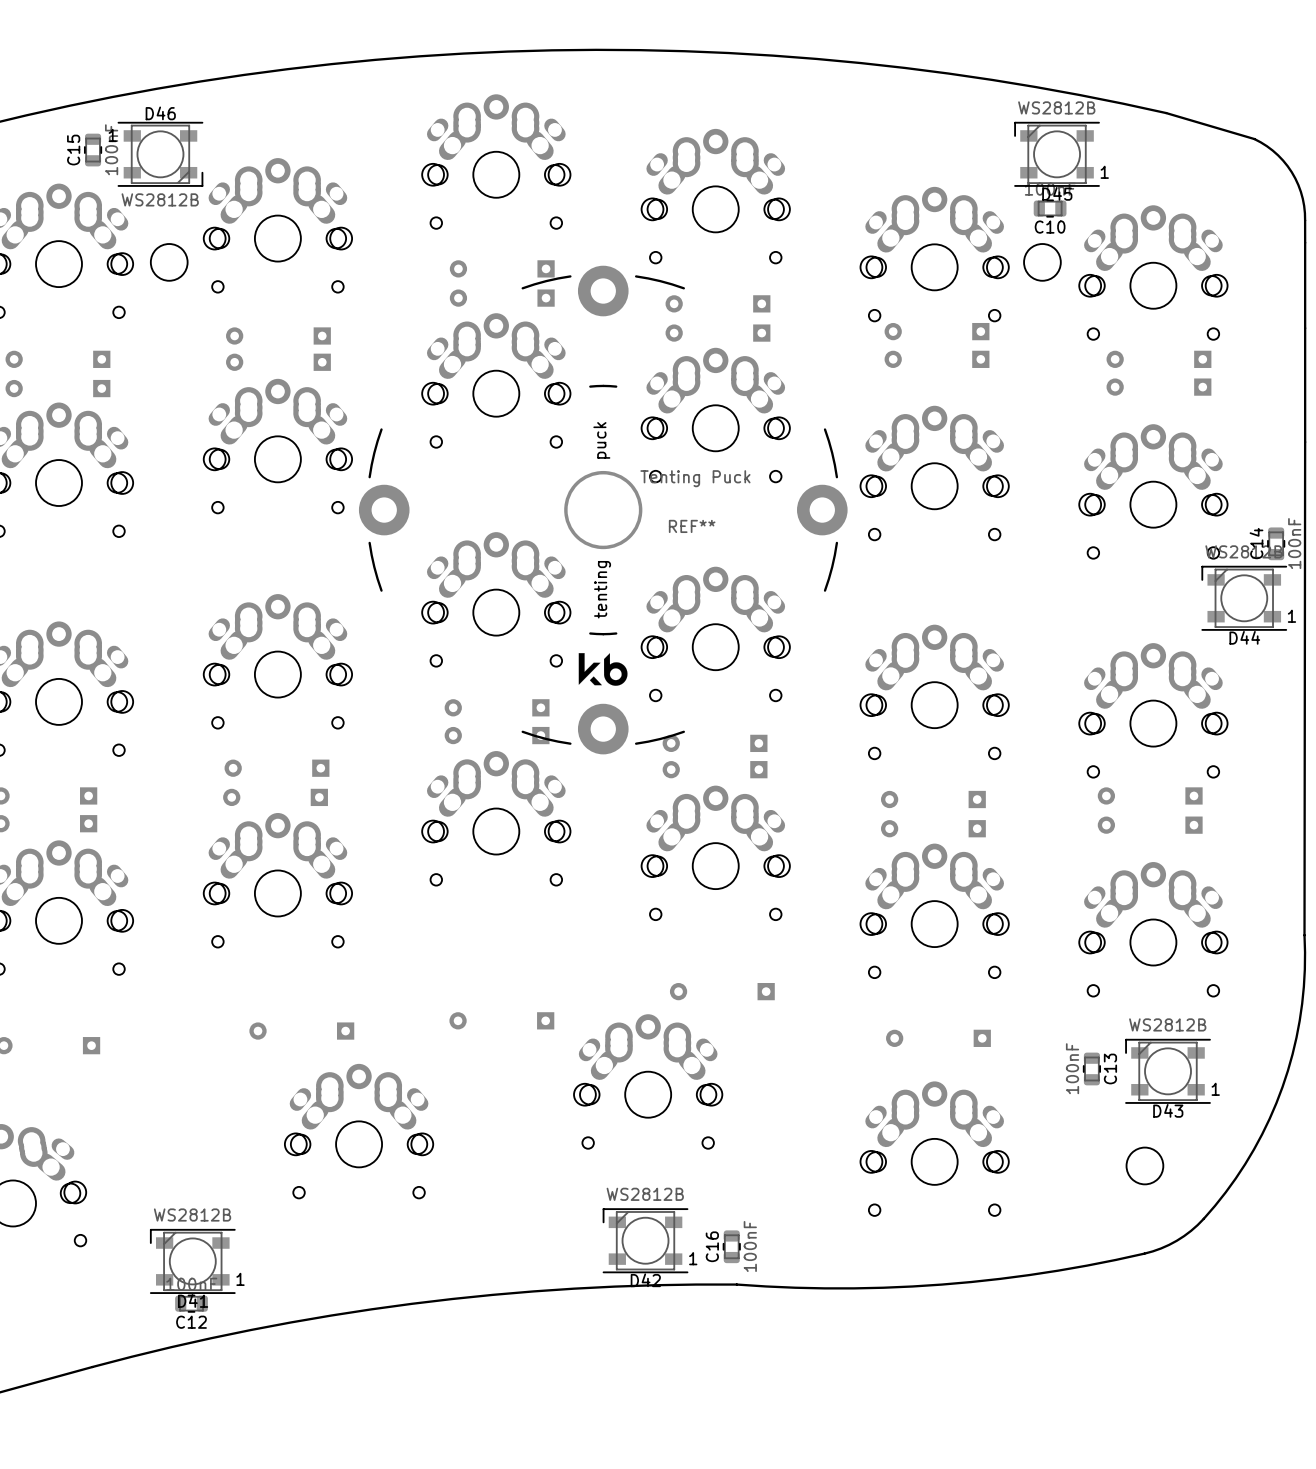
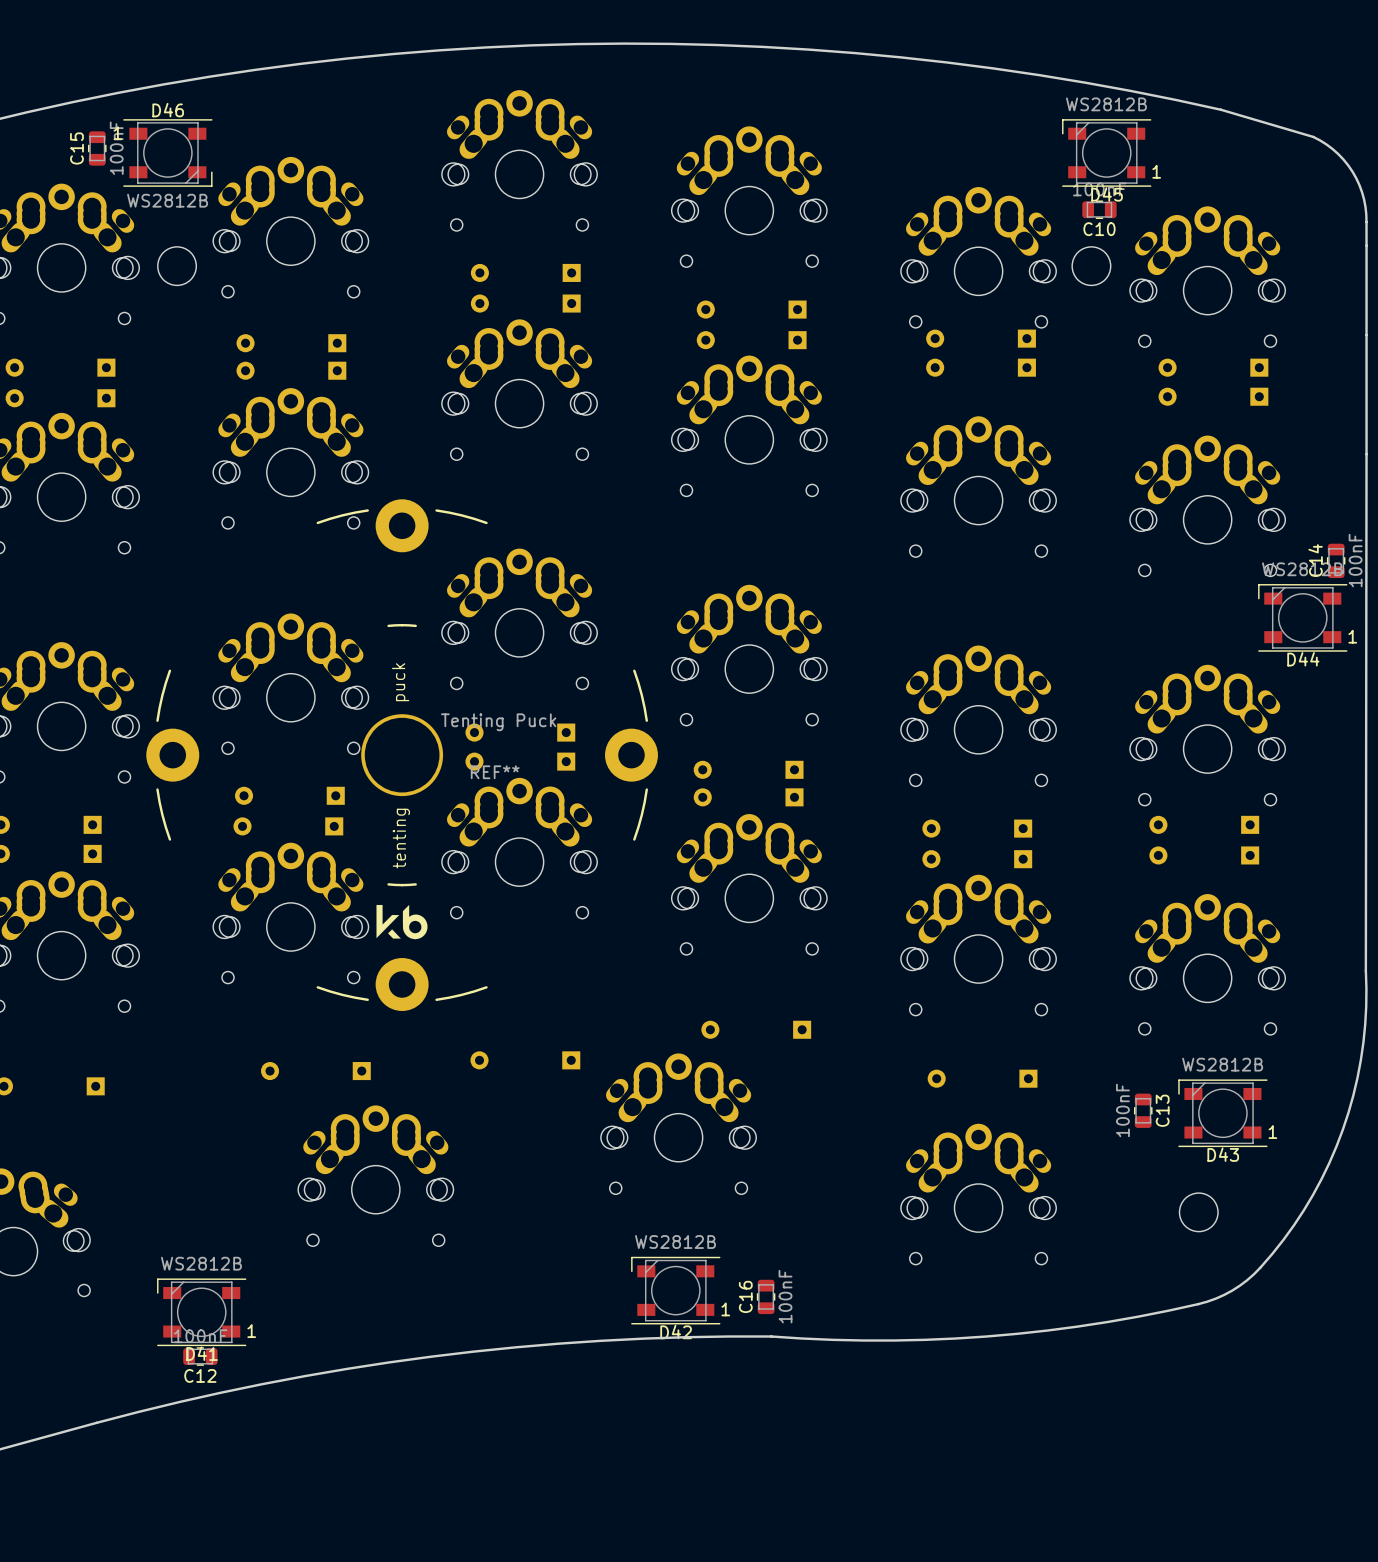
REF**: Tenting Puck (603, 510) -> none
REF**: none -> Tenting Puck (402, 755)

